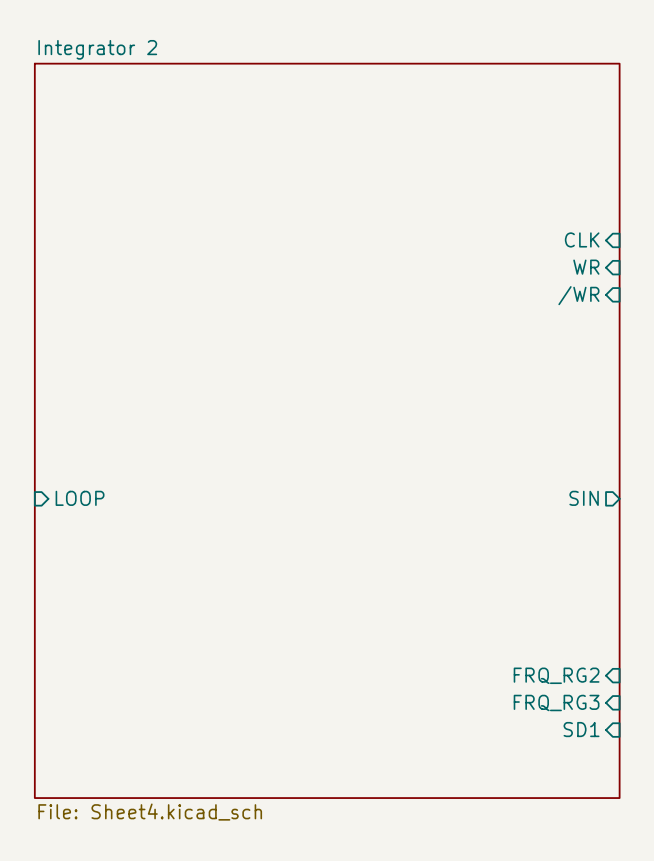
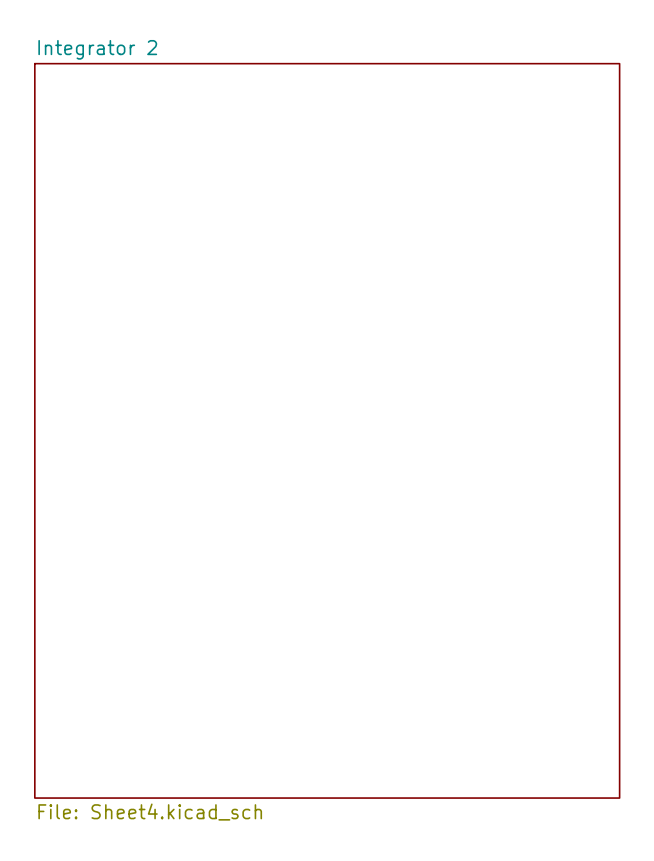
sheet pin: CLK (582, 239) -> none
sheet pin: WR (586, 267) -> none
sheet pin: /WR (578, 295) -> none
sheet pin: LOOP (80, 498) -> none
sheet pin: SIN (584, 498) -> none
sheet pin: FRQ_RG2 (556, 675) -> none
sheet pin: FRQ_RG3 (556, 702) -> none
sheet pin: SD1 (581, 729) -> none

